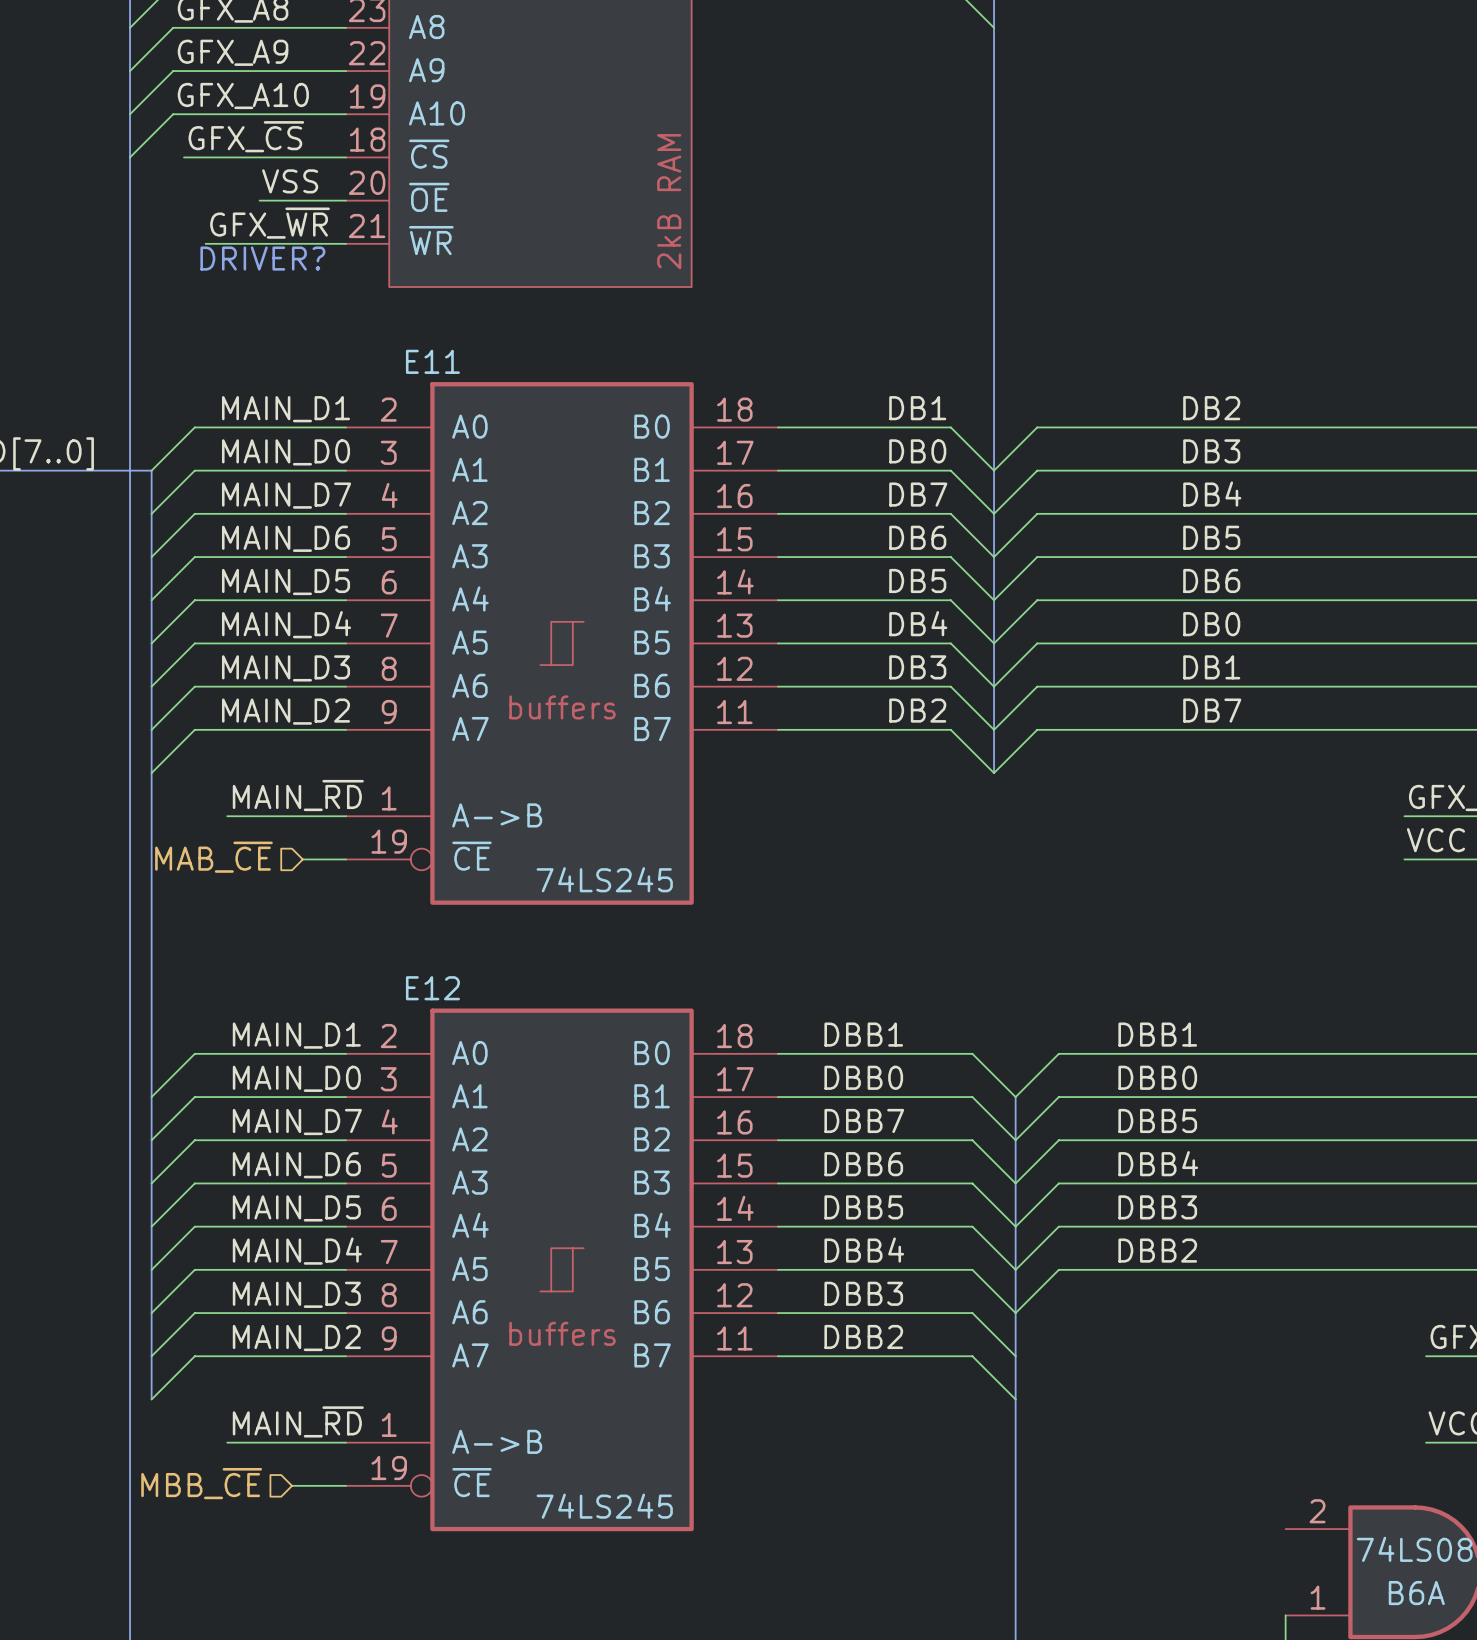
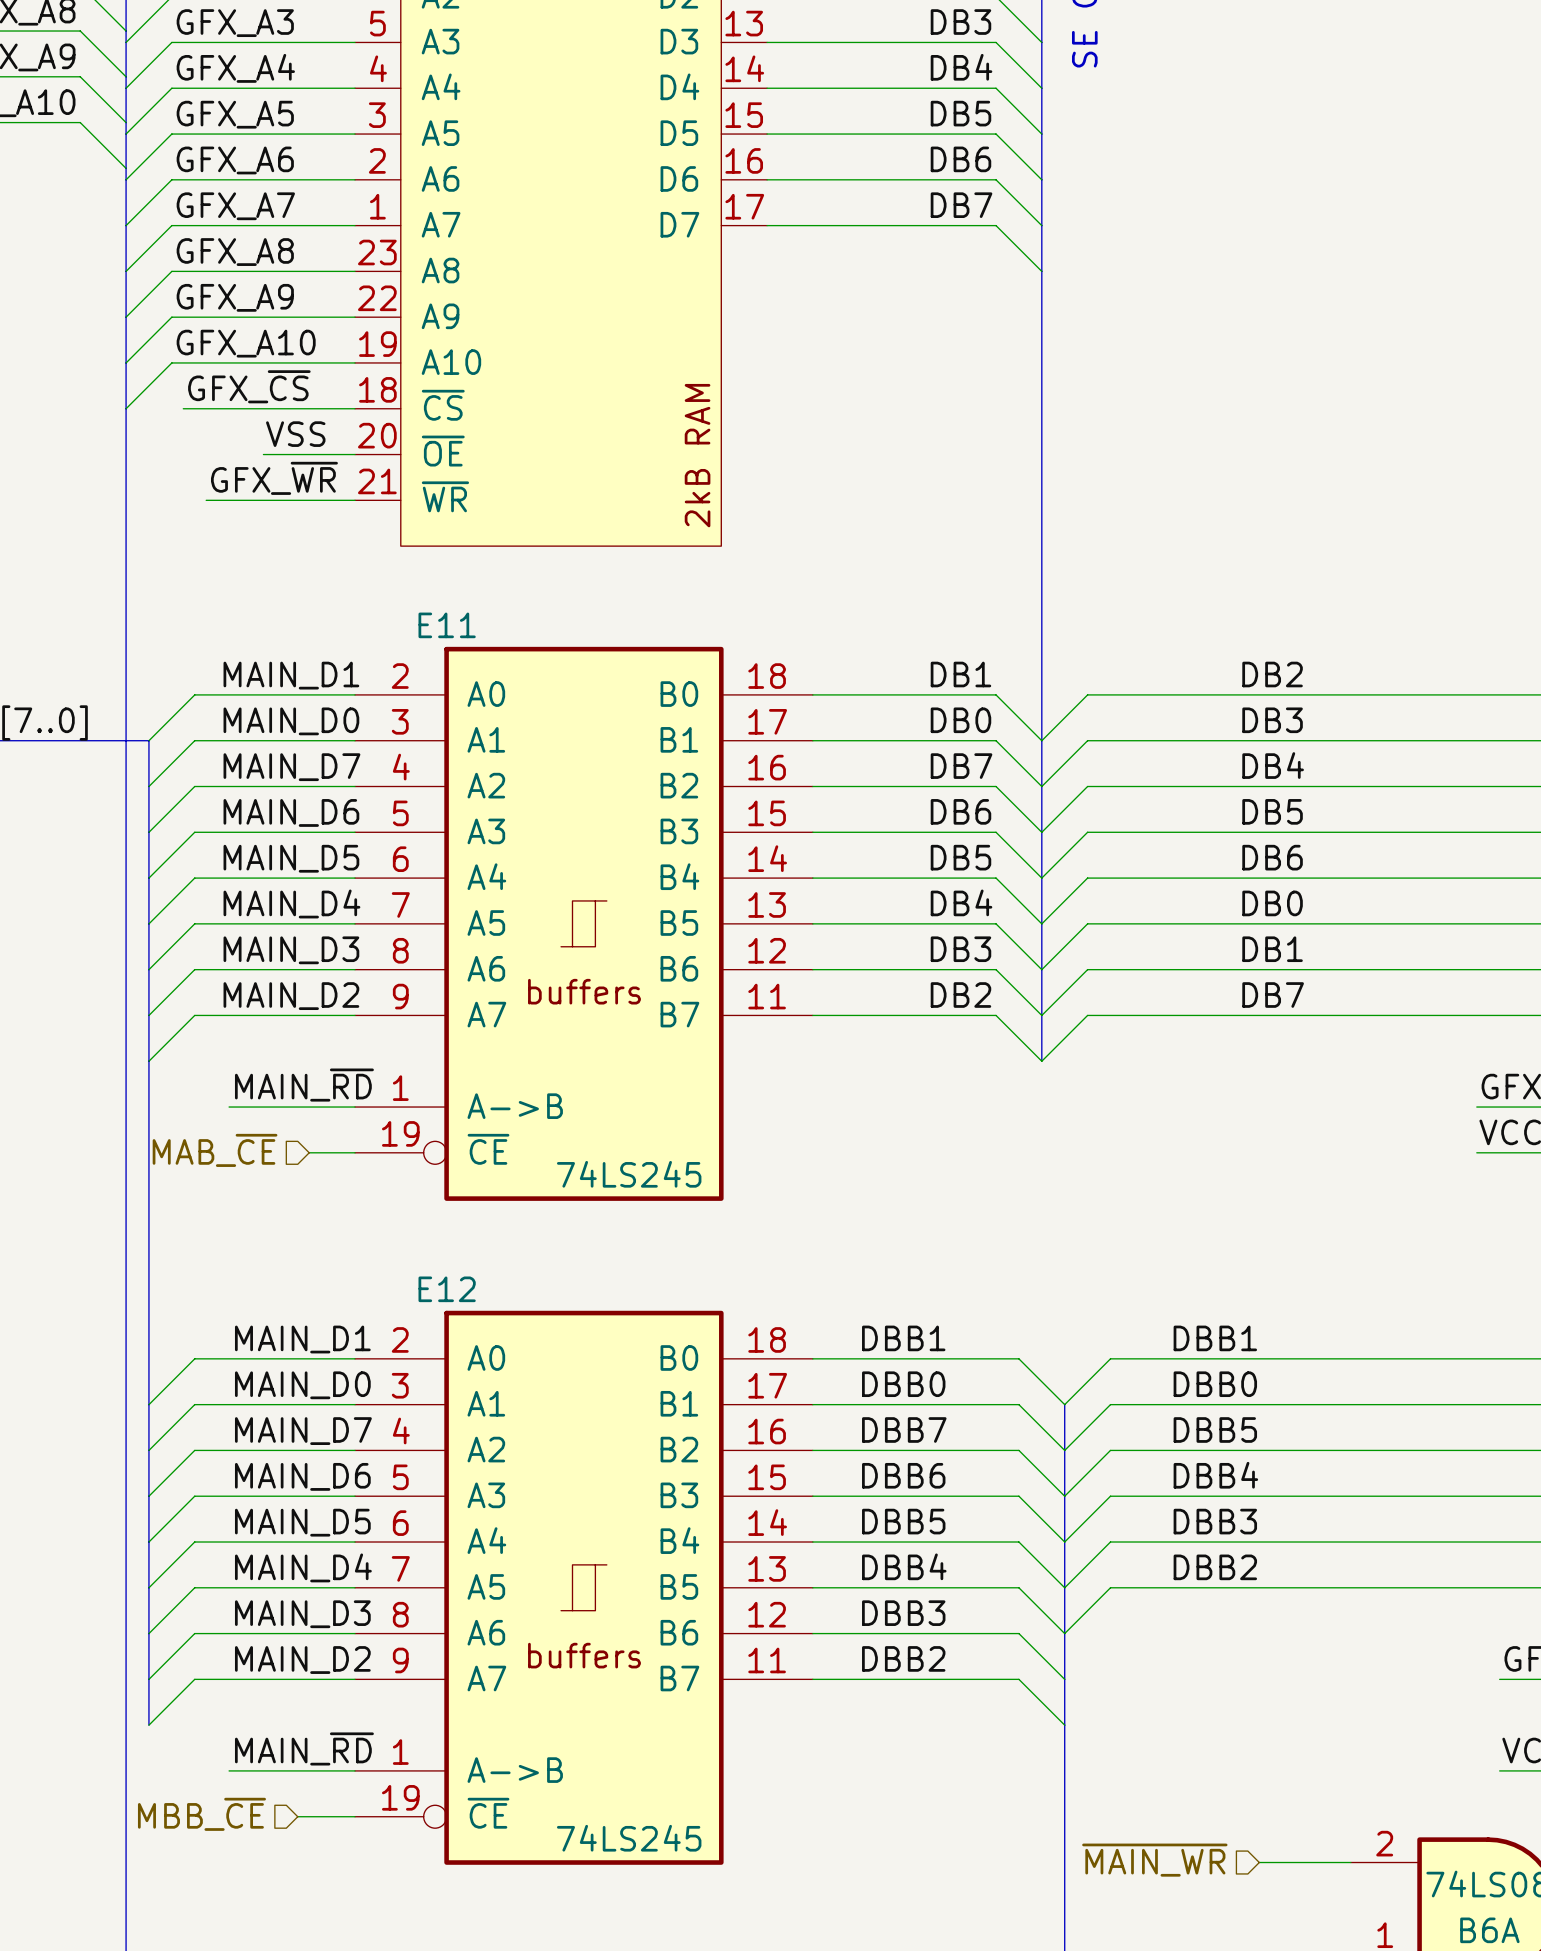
text: DRIVER? (262, 258) -> none
hierarchical label: none -> ~{MAIN_WR} (1154, 1860)
wire: none -> (1259, 1862) (1350, 1862)

